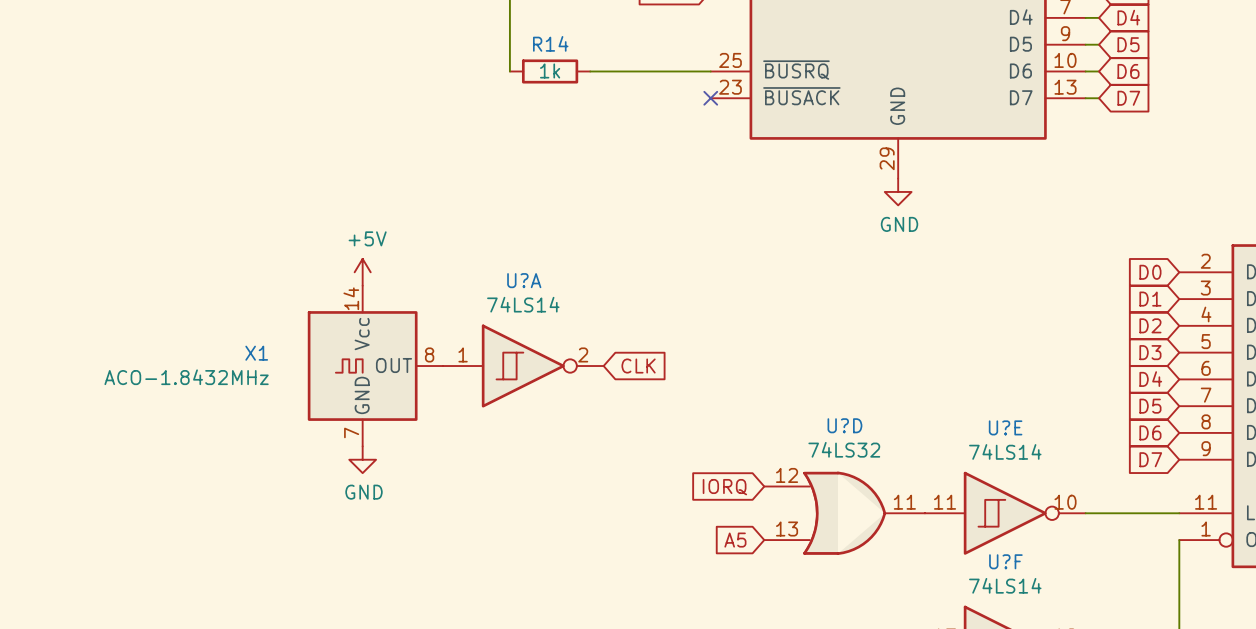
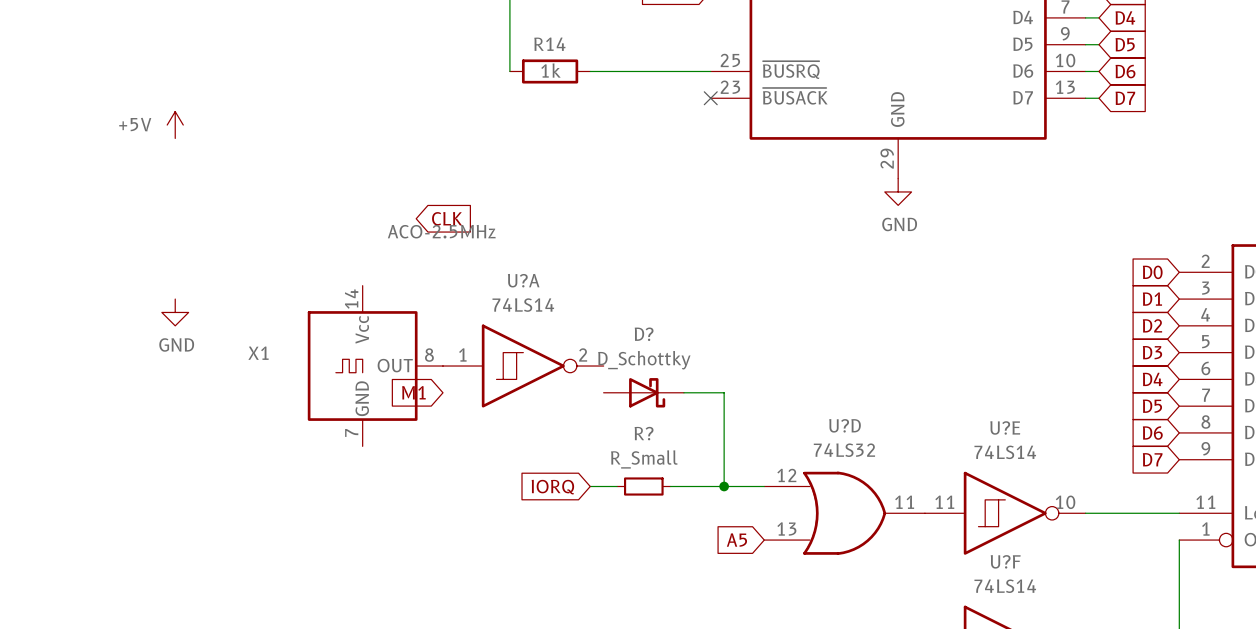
power symbol text position: +5V (367, 238) -> +5V (135, 124)
power symbol position: +5V (362, 272) -> +5V (175, 125)
global label position: CLK (638, 366) -> CLK (447, 218)
X1 value: ACO-1.8432MHz (186, 377) -> ACO-2.5MHz (441, 231)
global label: none -> M1 (413, 392)
D?: none -> D_Schottky (643, 392)
wire: none -> (683, 392) (724, 392) (724, 486)
power symbol position: GND (362, 459) -> GND (175, 312)
wire: none -> (590, 486) (617, 486)
R?: none -> R_Small (643, 486)
wire: none -> (670, 486) (764, 486)
junction: none -> (724, 486)
global label position: IORQ (724, 487) -> IORQ (552, 487)

